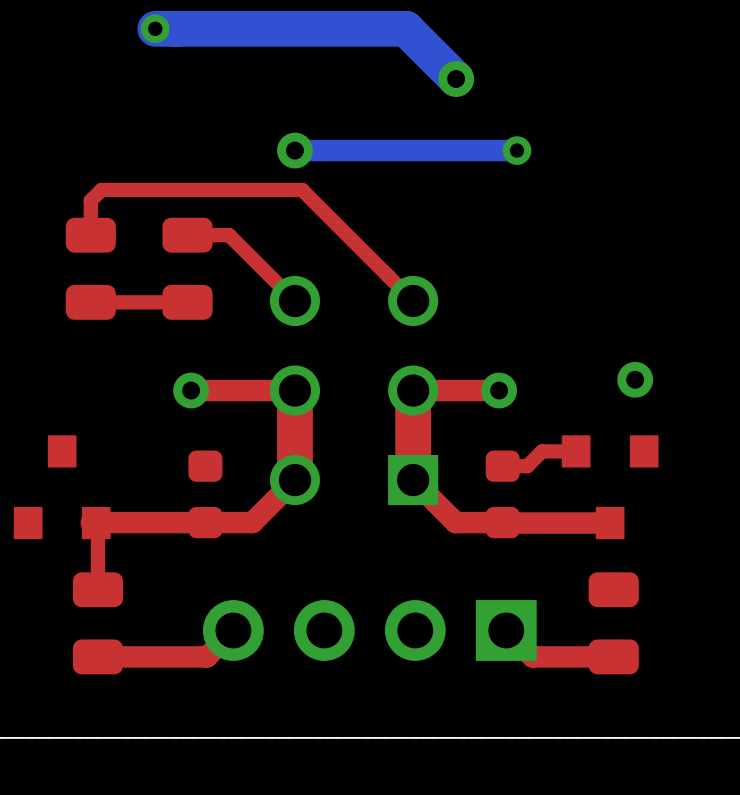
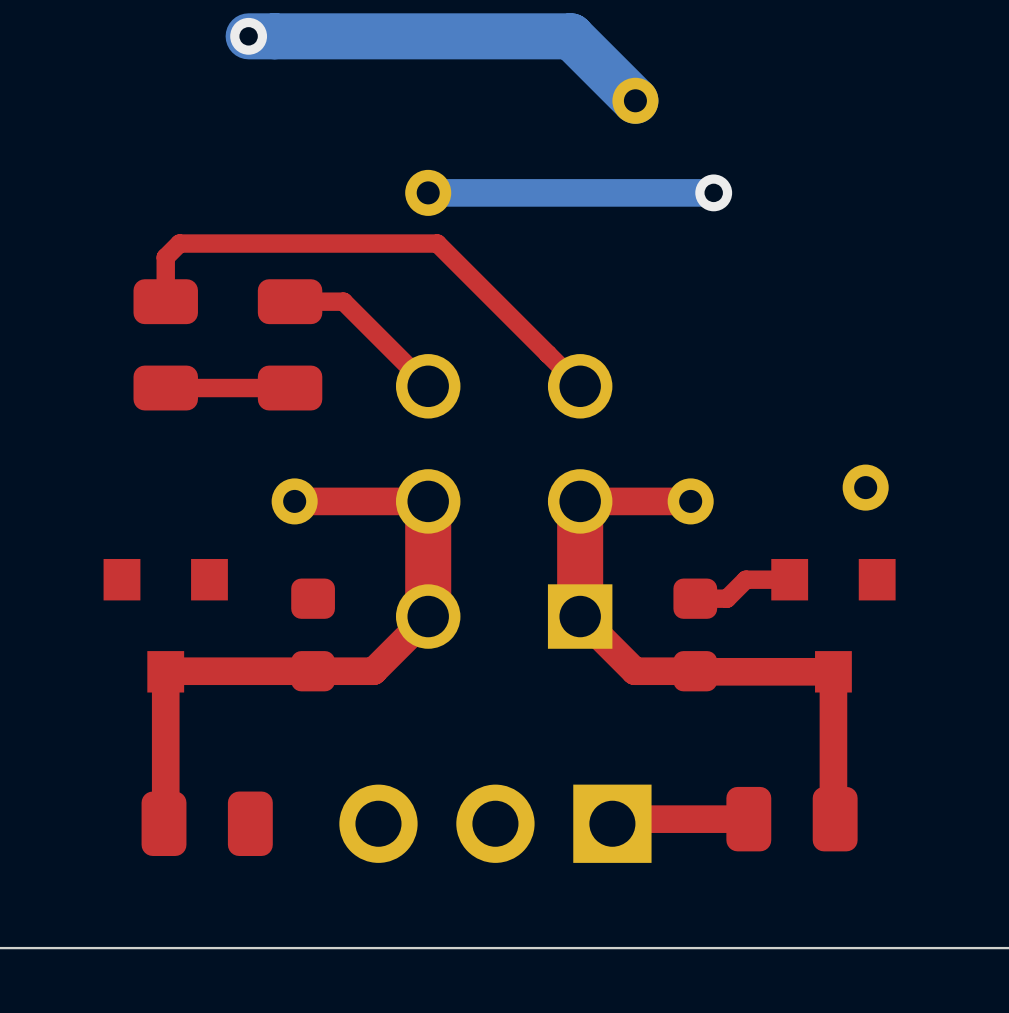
part rotation: 0° (62, 487) -> 180° (165, 625)
top track: none -> (165, 671) (165, 822) (164, 823)
top track: (96, 523) (97, 524) (97, 589) -> none
top track: none -> (833, 671) (833, 817) (835, 819)
part footprint: [202, 600, 537, 661] -> [339, 784, 652, 863]
part rotation: 0° (97, 623) -> 90° clockwise (207, 823)
part rotation: 0° (613, 623) -> 90° clockwise (791, 819)
top track: (233, 630) (206, 656) (97, 656) -> none
top track: (506, 630) (532, 656) (613, 656) -> none
top track: none -> (748, 819) (617, 819) (612, 823)

